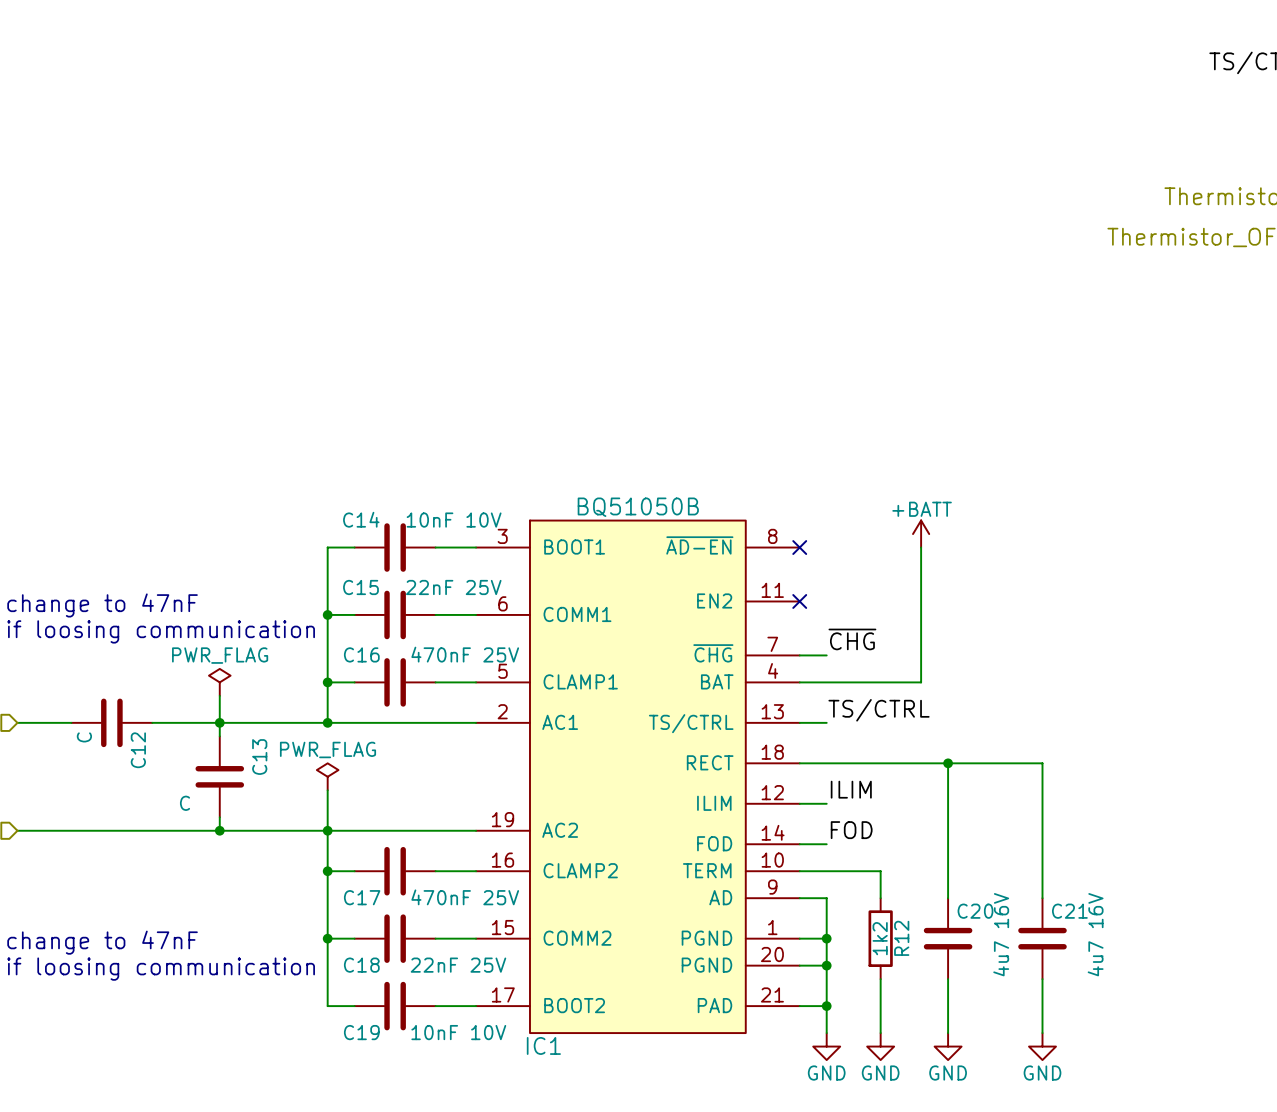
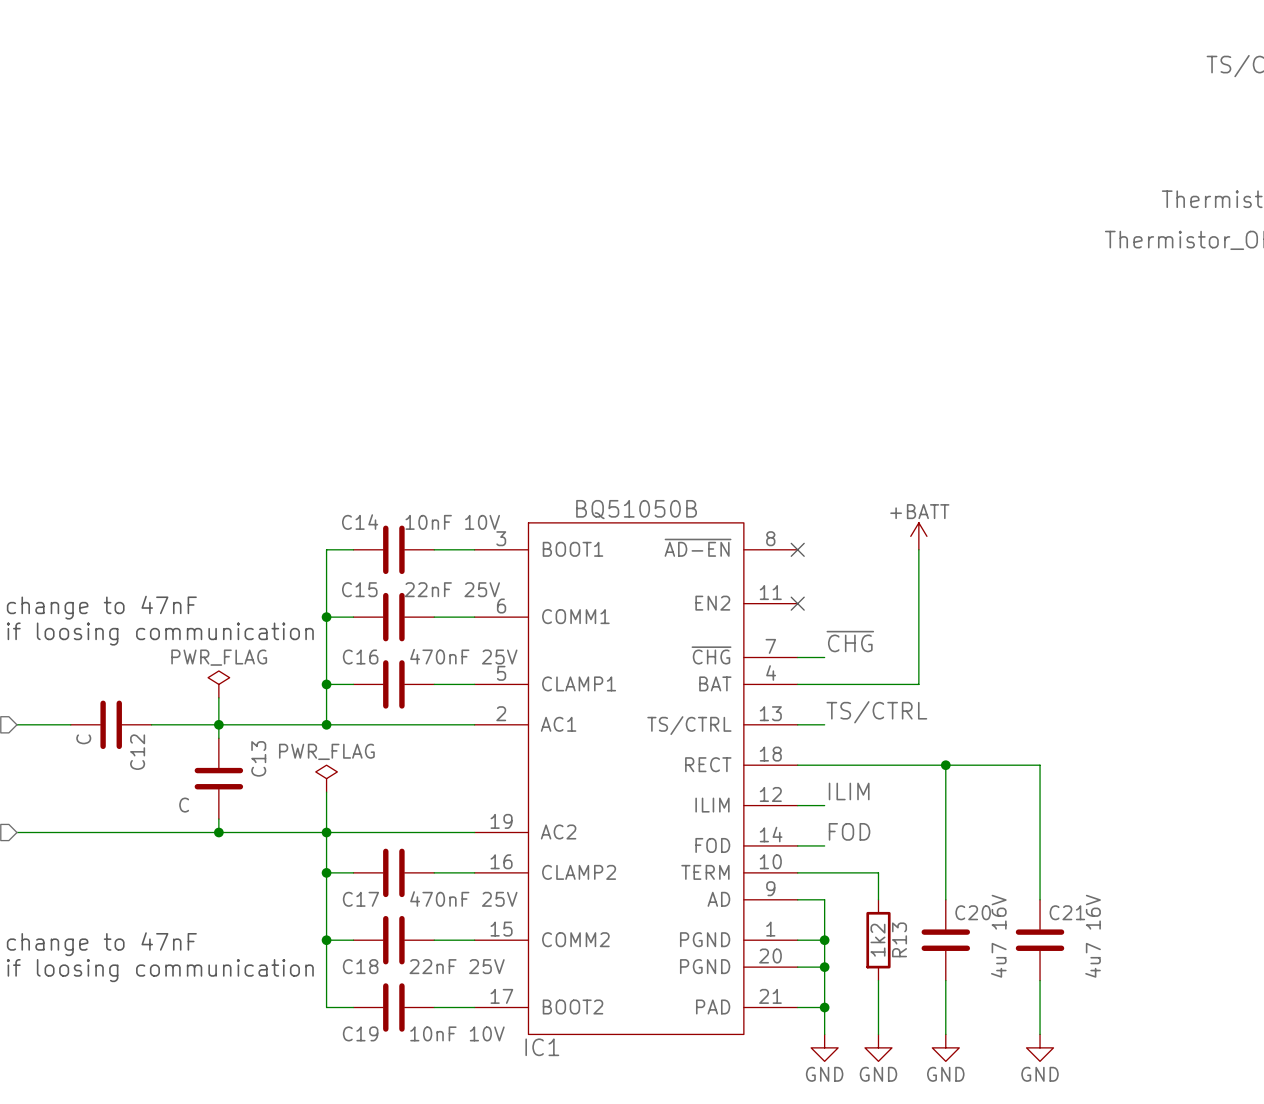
R12 name: R12 (901, 938) -> R13 (899, 939)

